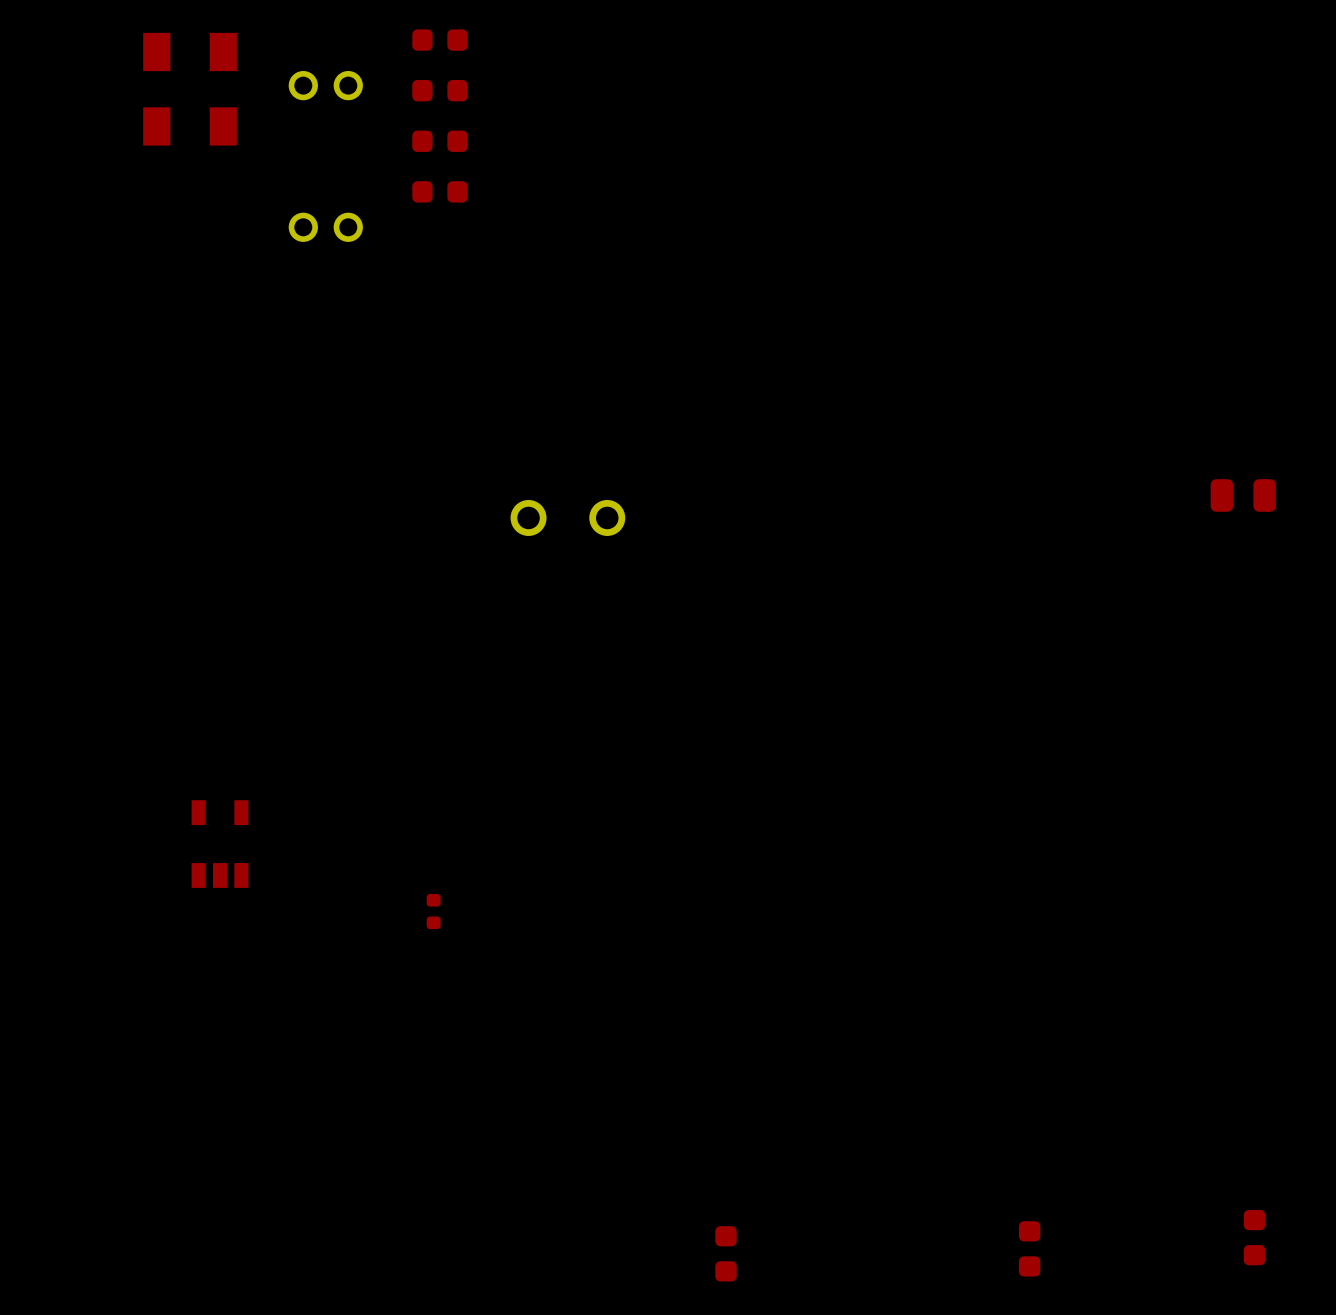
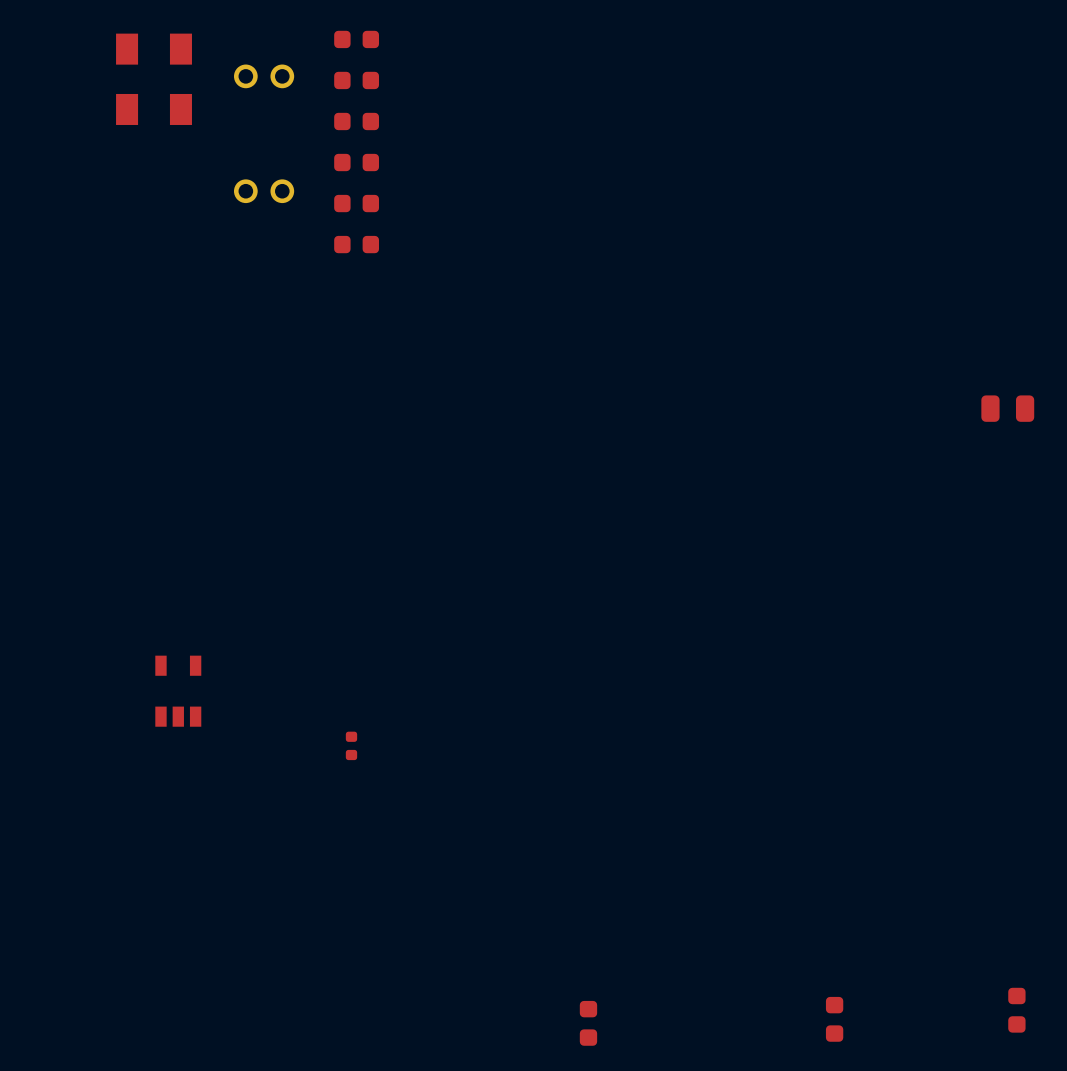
part: none -> (356, 203)
part: none -> (356, 244)
part: (567, 517) -> none

